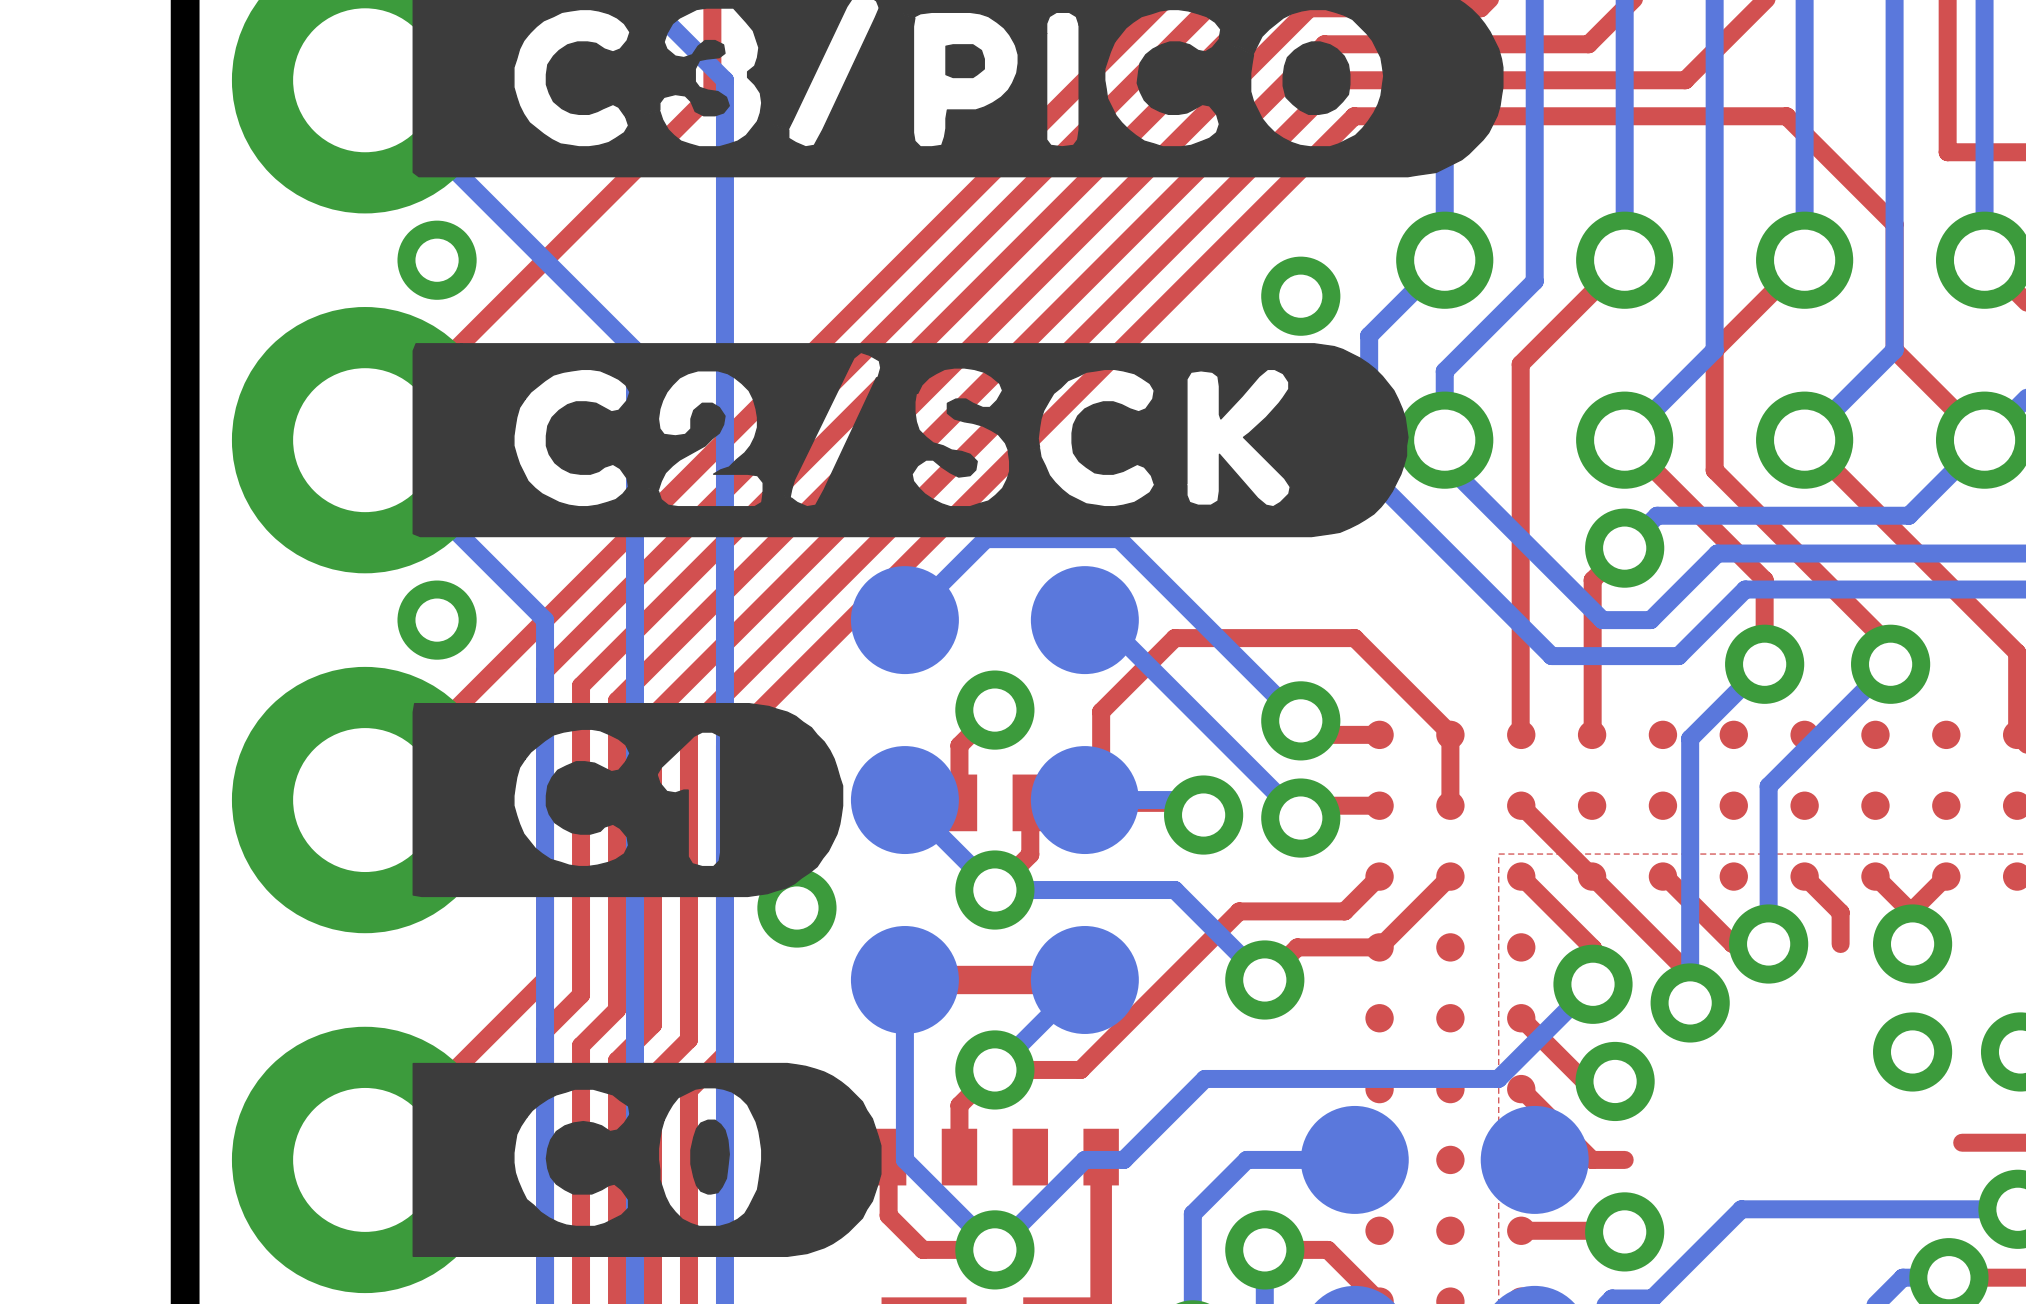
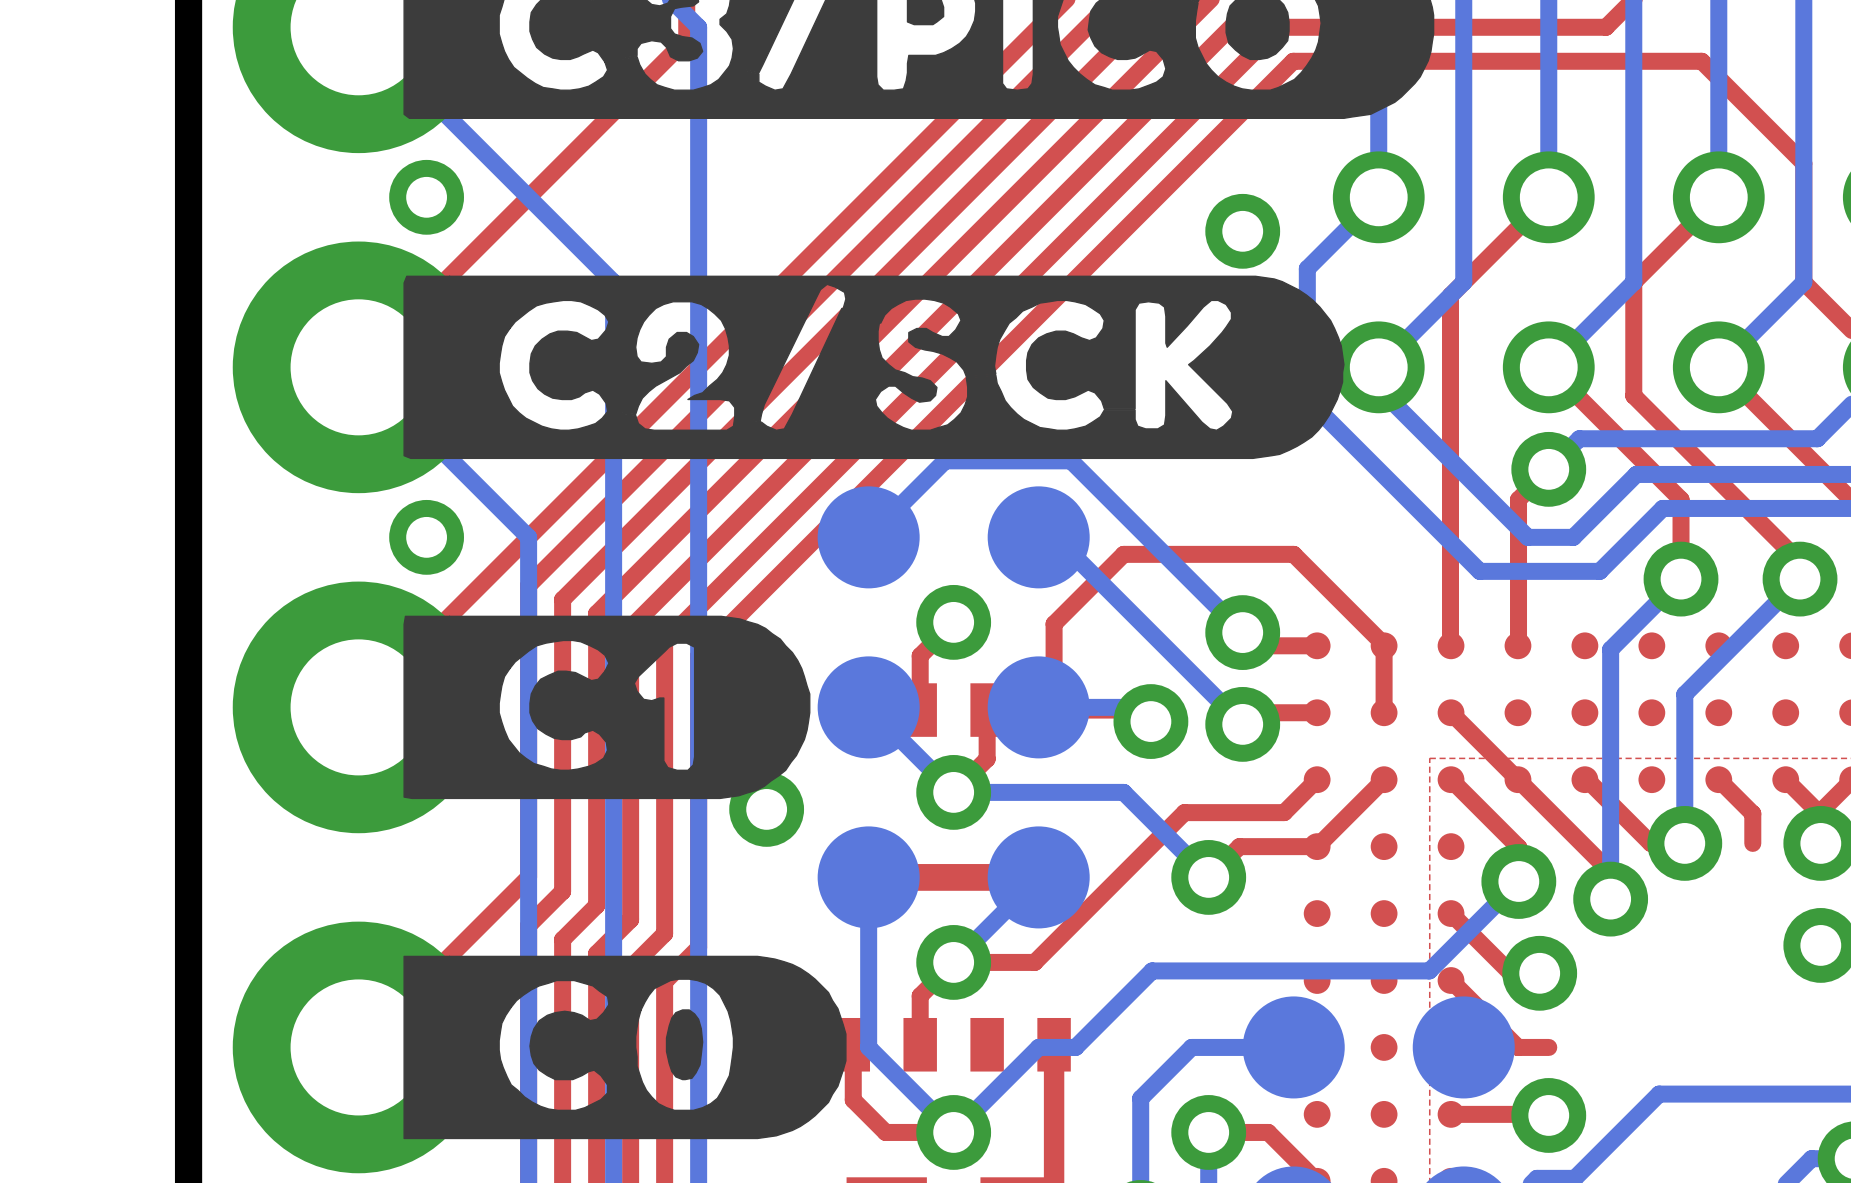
bottom track: (1534, 281) (1444, 371) (1444, 440) -> (1463, 217) (1463, 282) (1378, 367)

